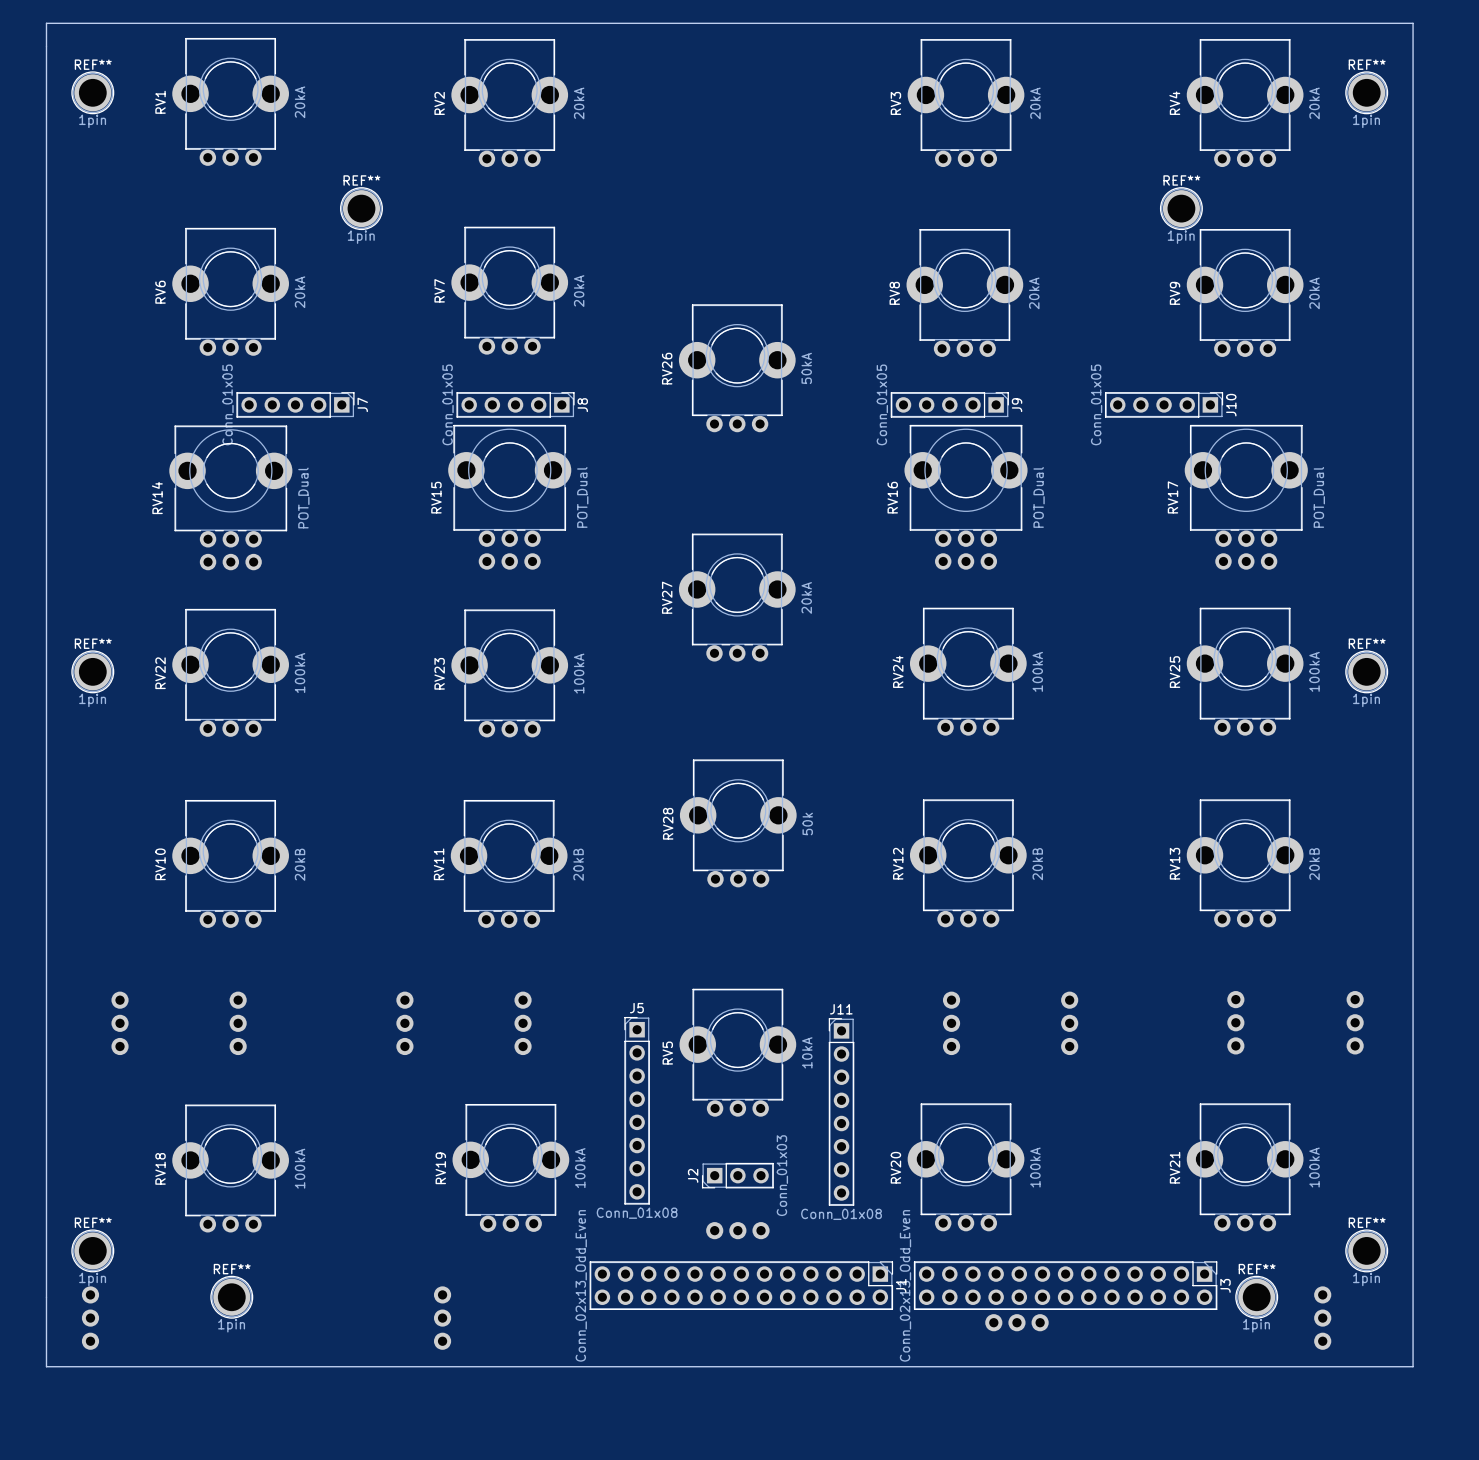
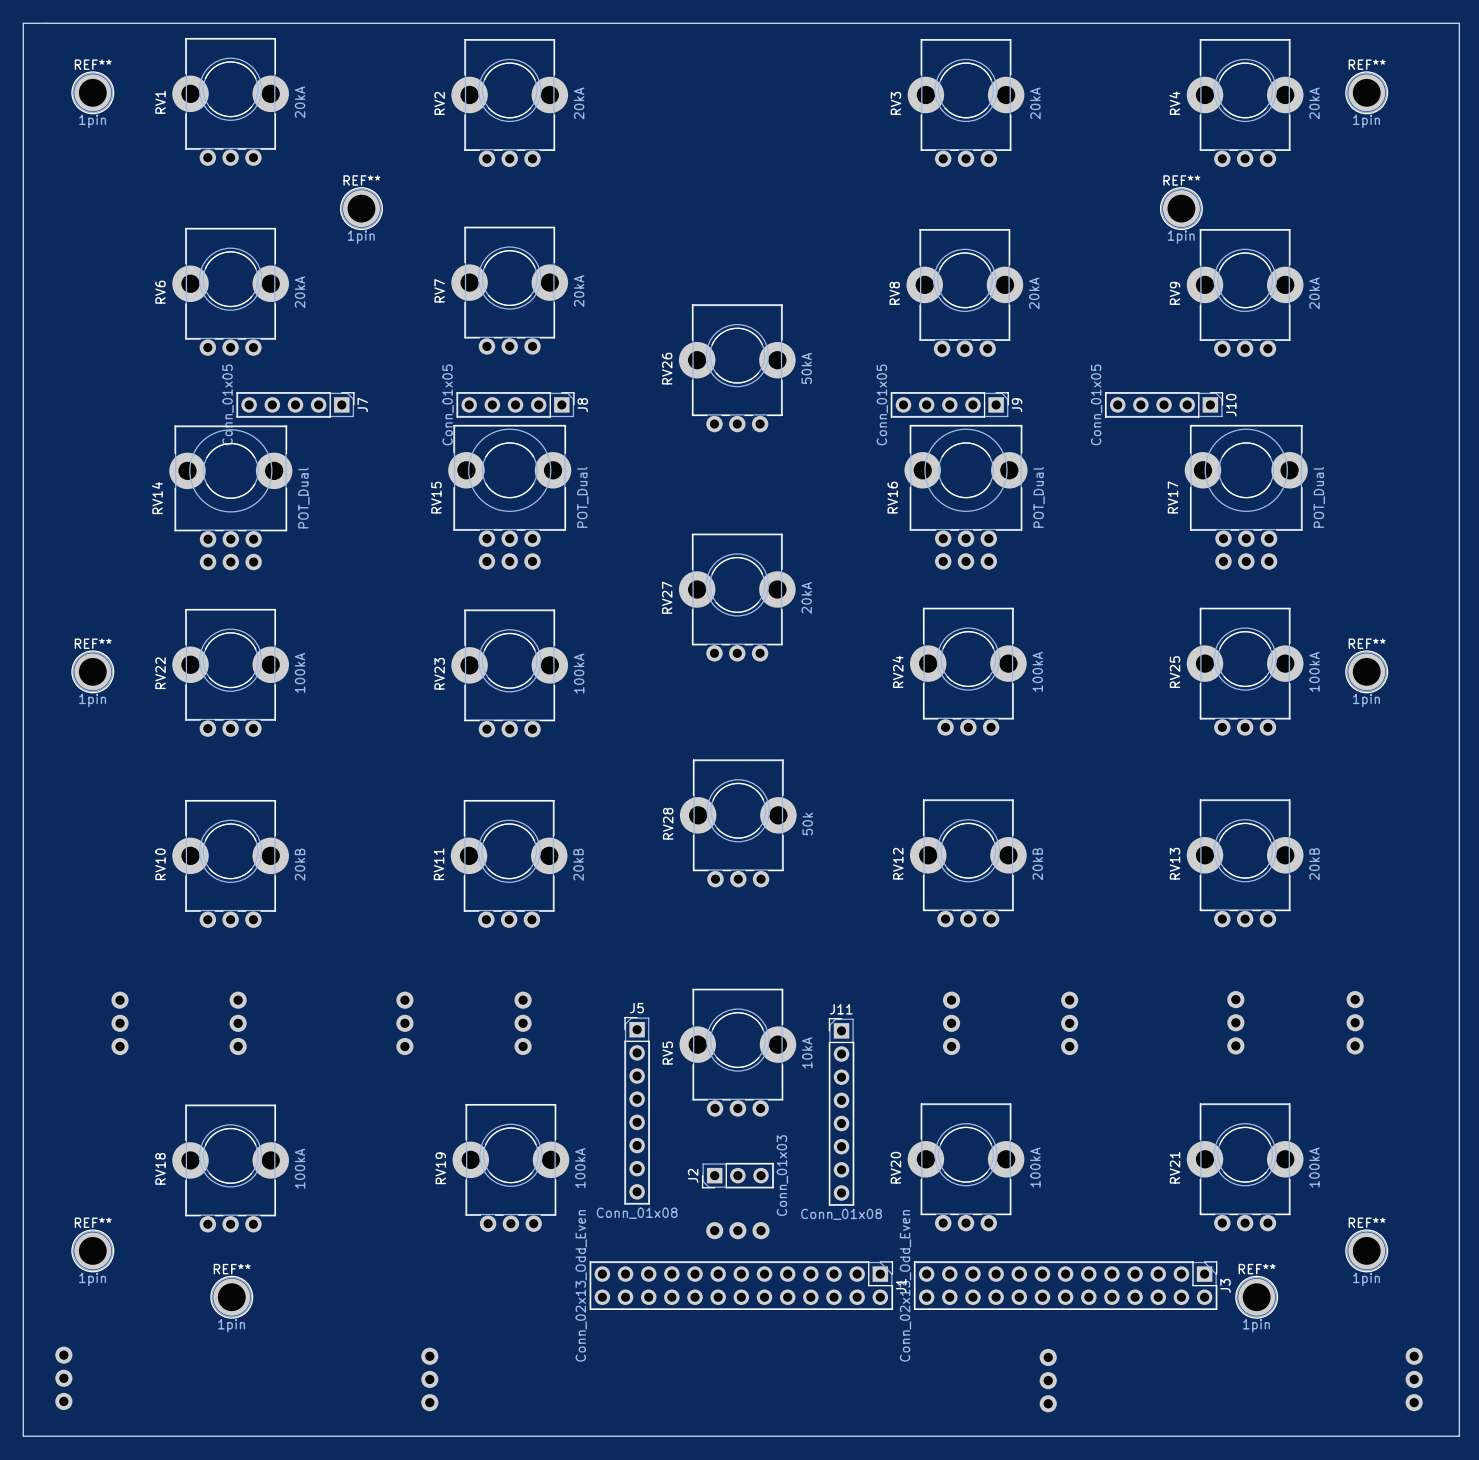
board edge: (46, 23) (46, 1366) (1413, 1366) (1413, 23) -> (46, 23) (23, 23) (23, 1436) (1459, 1436) (1459, 23) (1413, 23)
part position: (90, 1318) -> (63, 1378)
part position: (442, 1318) -> (429, 1379)
part position: (1322, 1318) -> (1414, 1379)
part rotation: 0° (1016, 1322) -> 90° clockwise (1048, 1380)
part position: (1016, 1322) -> (1048, 1380)

